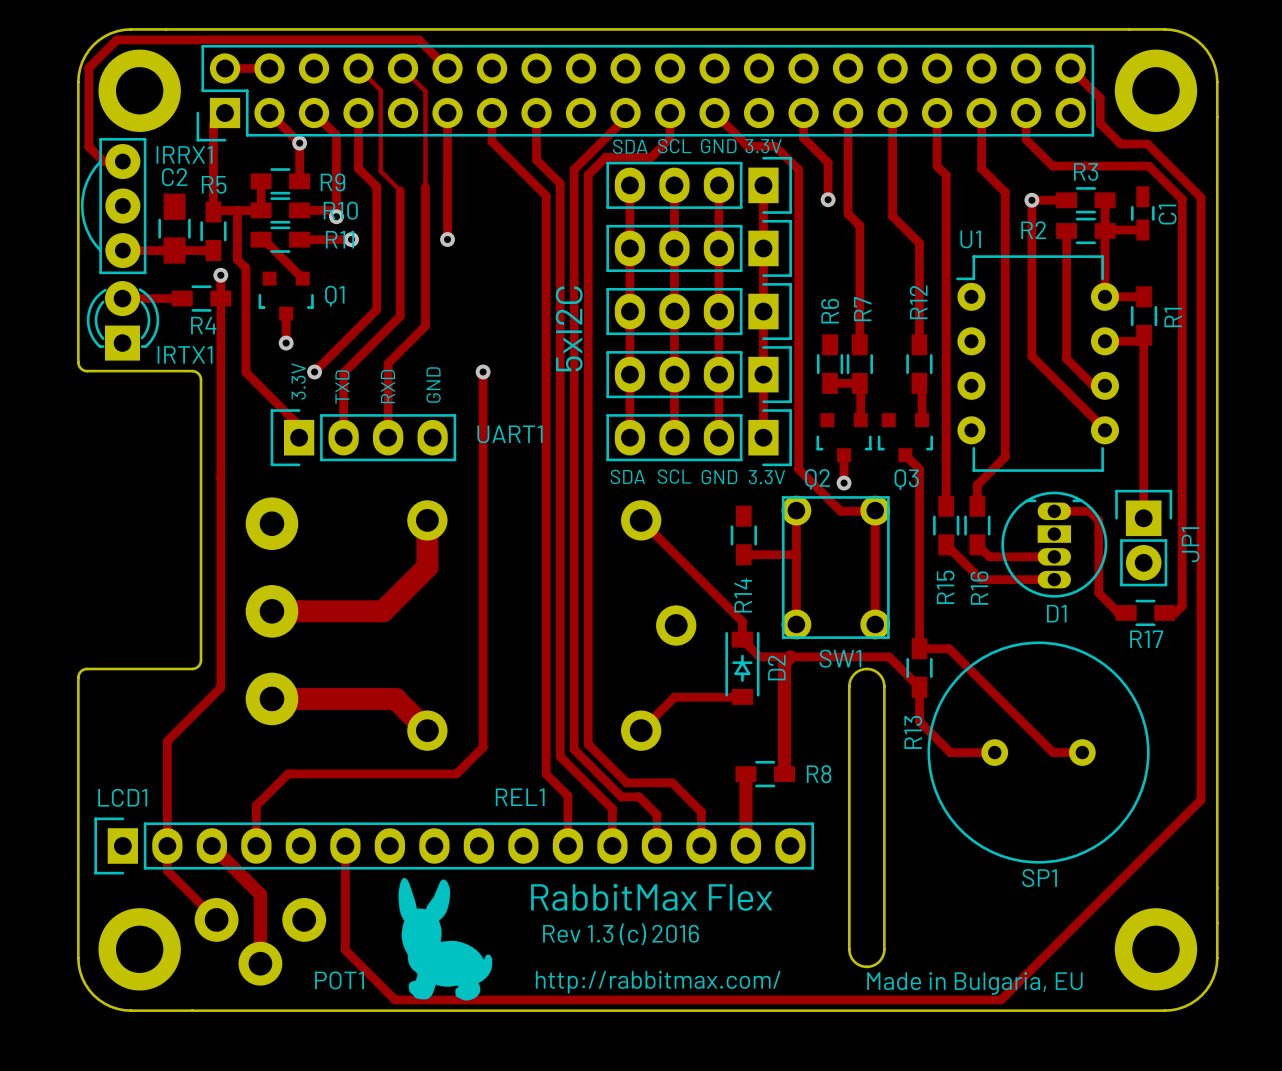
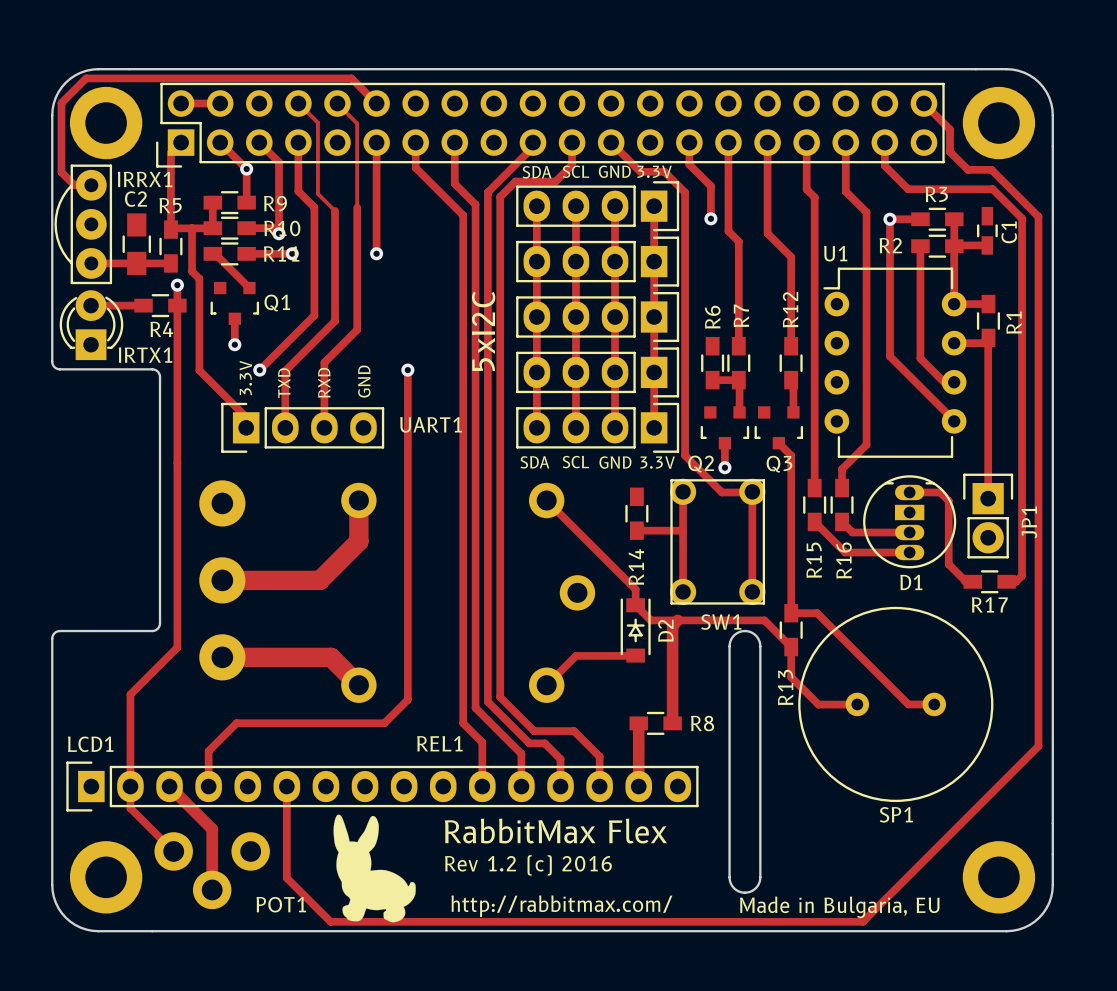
text: Rev 1.3 (c) 2016 (621, 934) -> Rev 1.2 (c) 2016 (528, 865)

